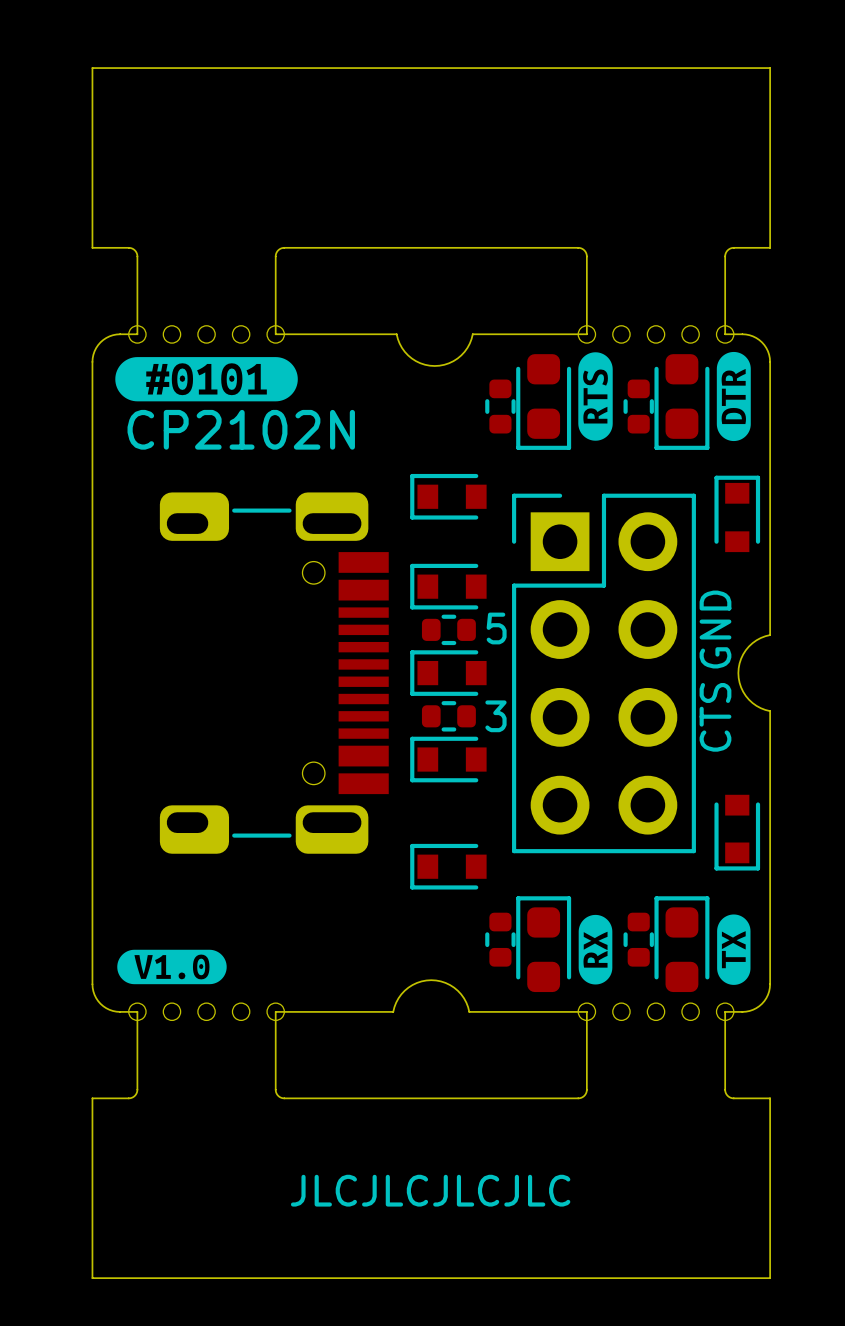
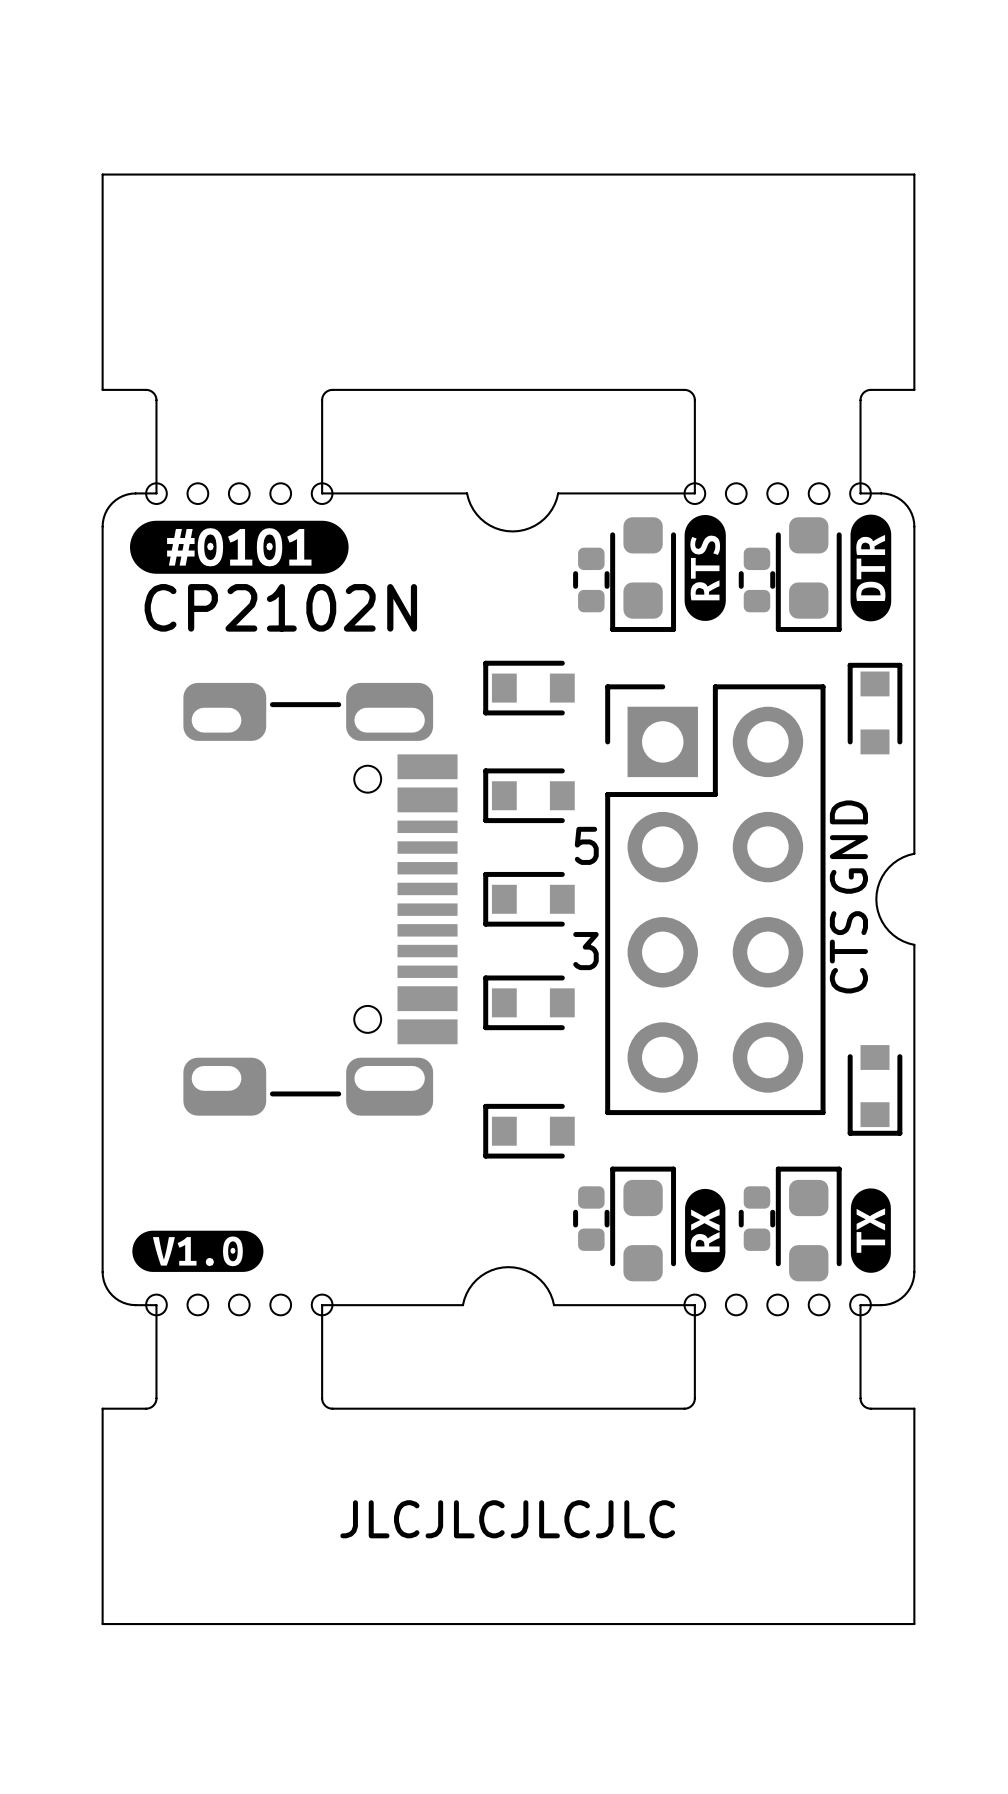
part: (448, 629) -> none
part: (448, 716) -> none

